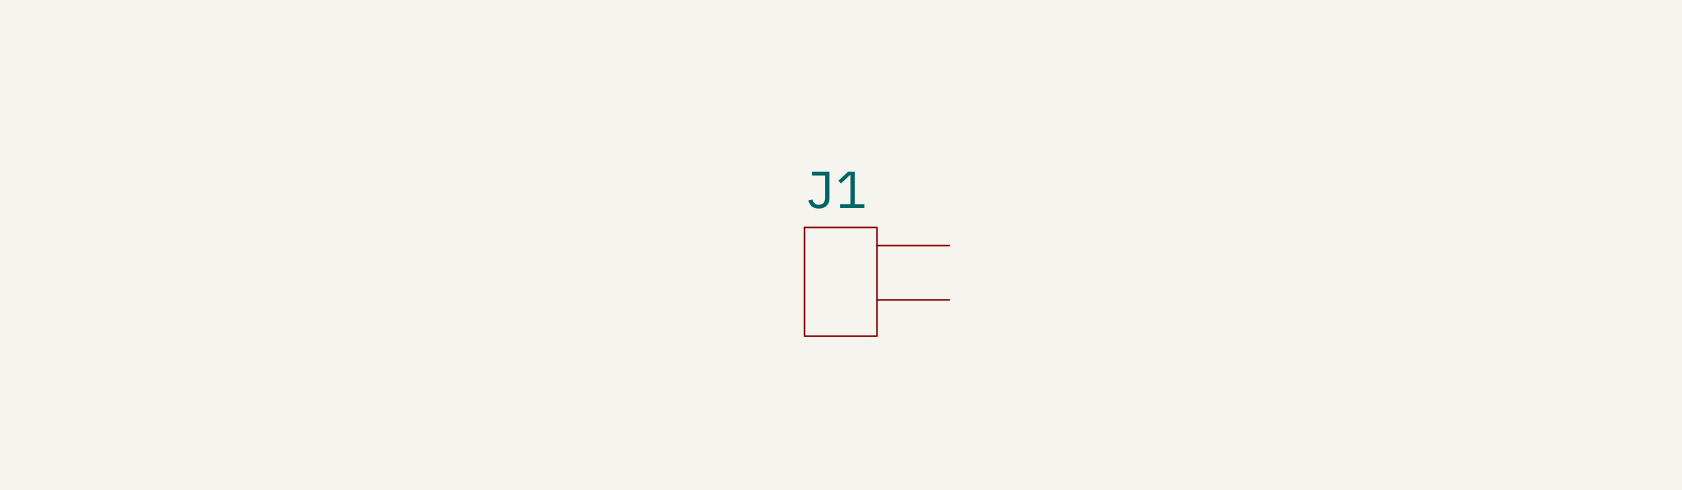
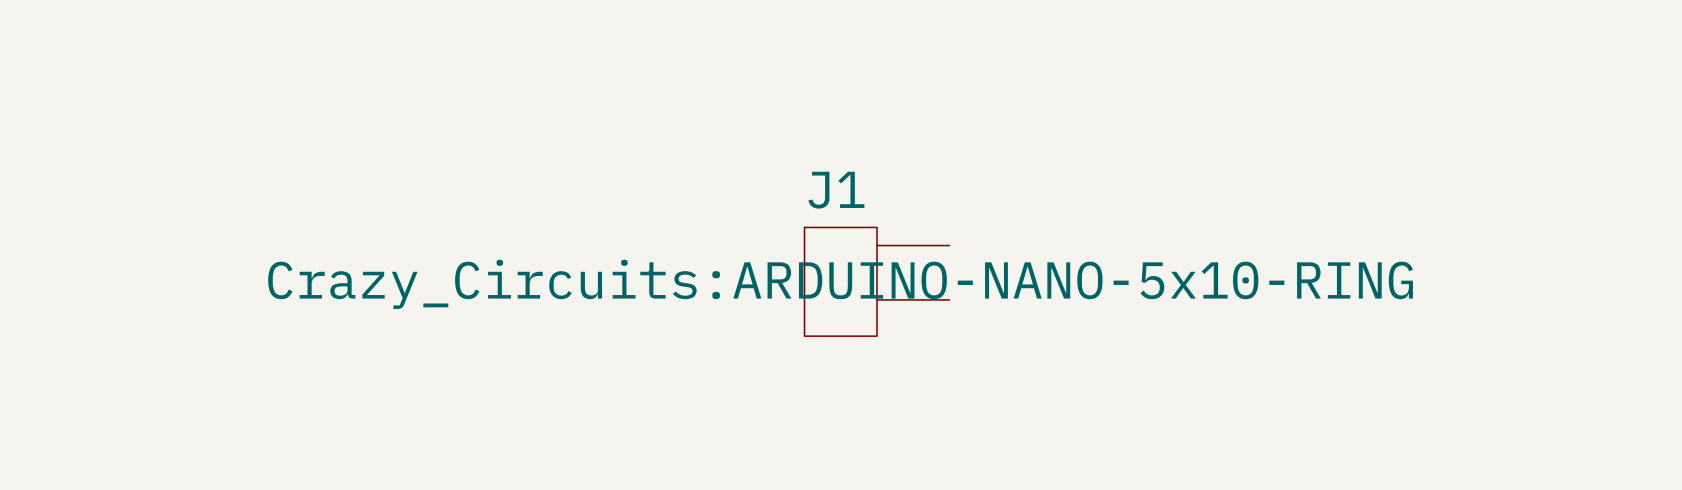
J1 text: none -> Crazy_Circuits:ARDUINO-NANO-5x10-RING (840, 284)

